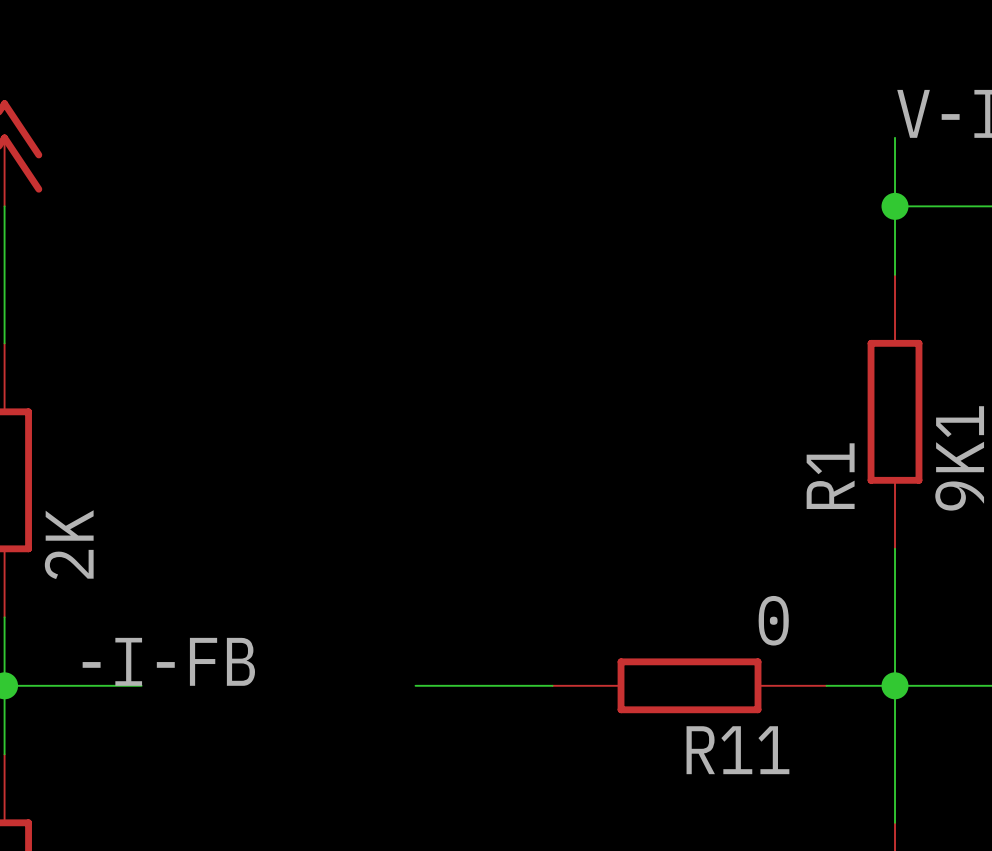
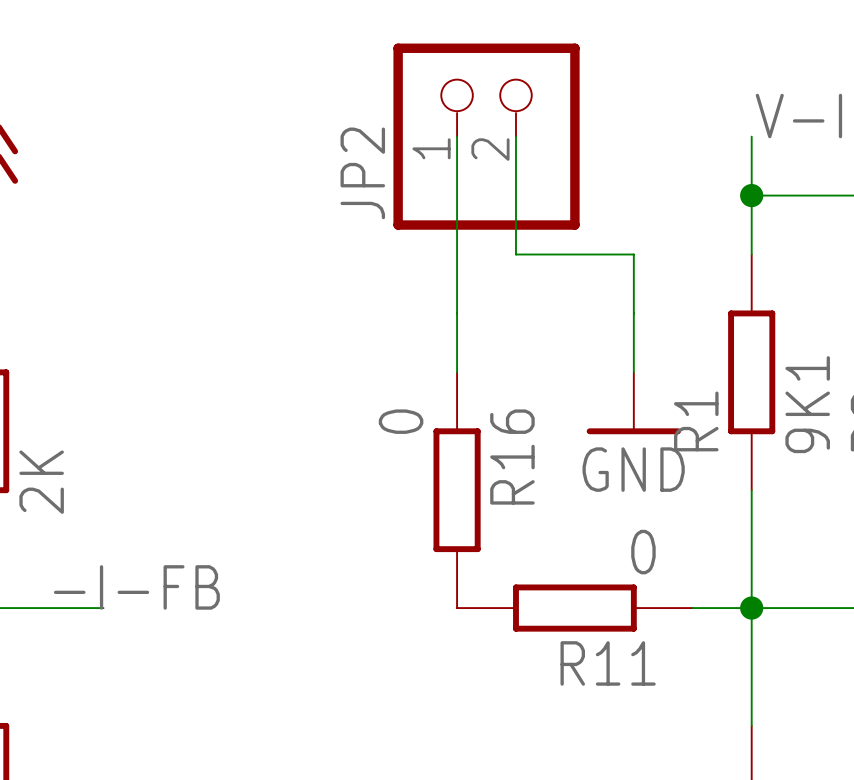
wire: none -> (457, 136) (457, 372)
JP2: none -> (486, 136)
wire: none -> (515, 136) (515, 254) (633, 254) (633, 372)
power symbol: none -> GND (633, 403)
R16: none -> 0 (457, 490)
wire: (415, 685) (552, 685) -> none

